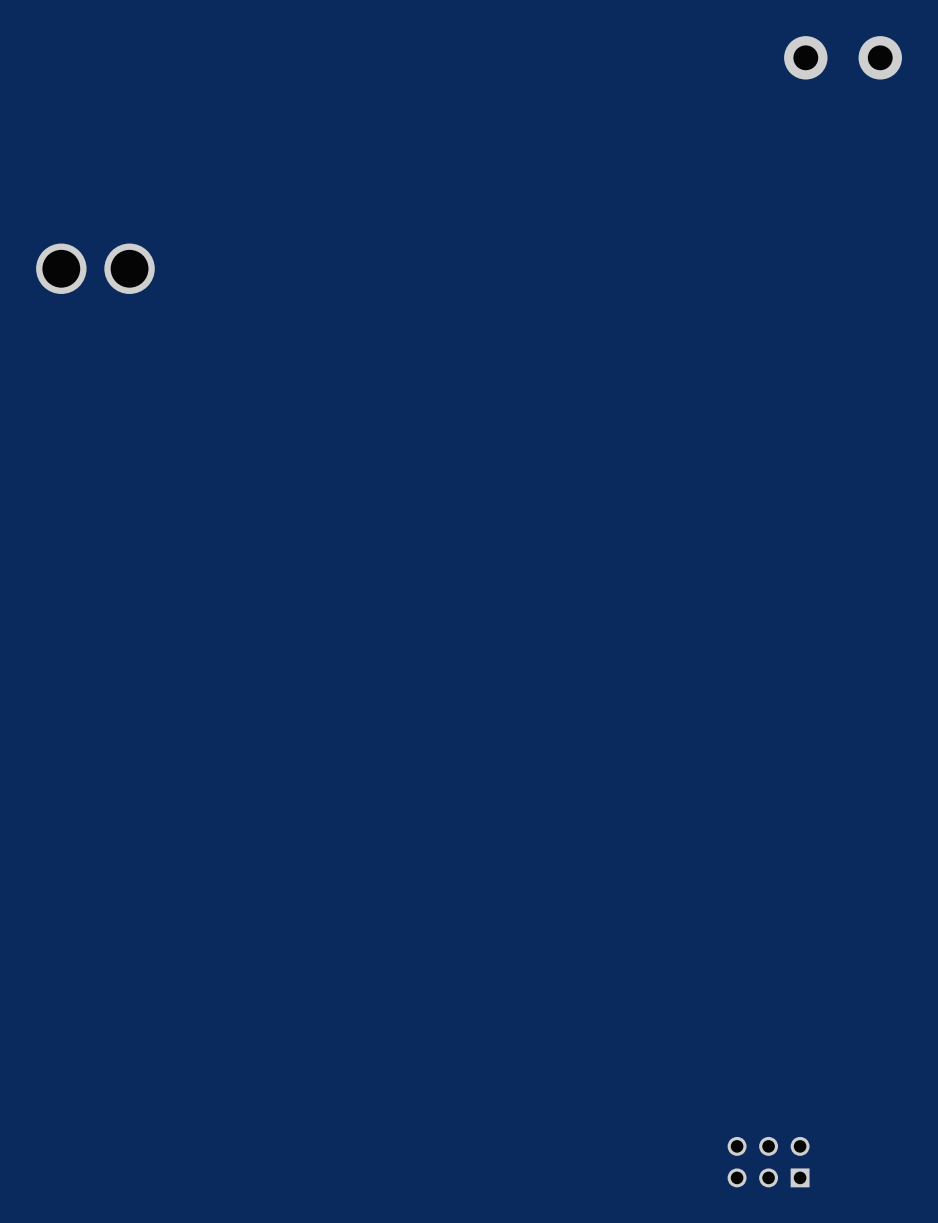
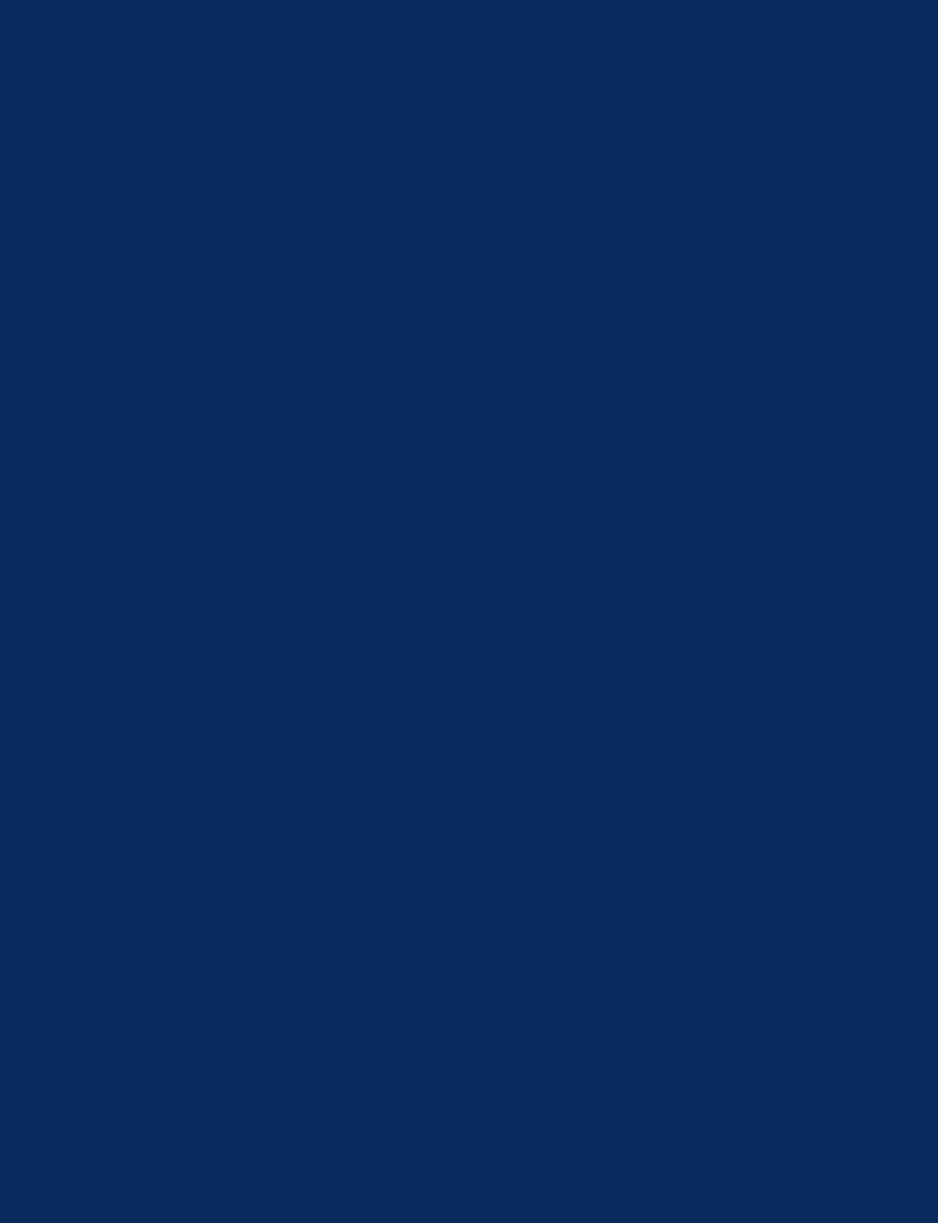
part: (805, 57) -> none
part: (880, 57) -> none
part: (61, 268) -> none
part: (129, 268) -> none
part: (768, 1162) -> none

